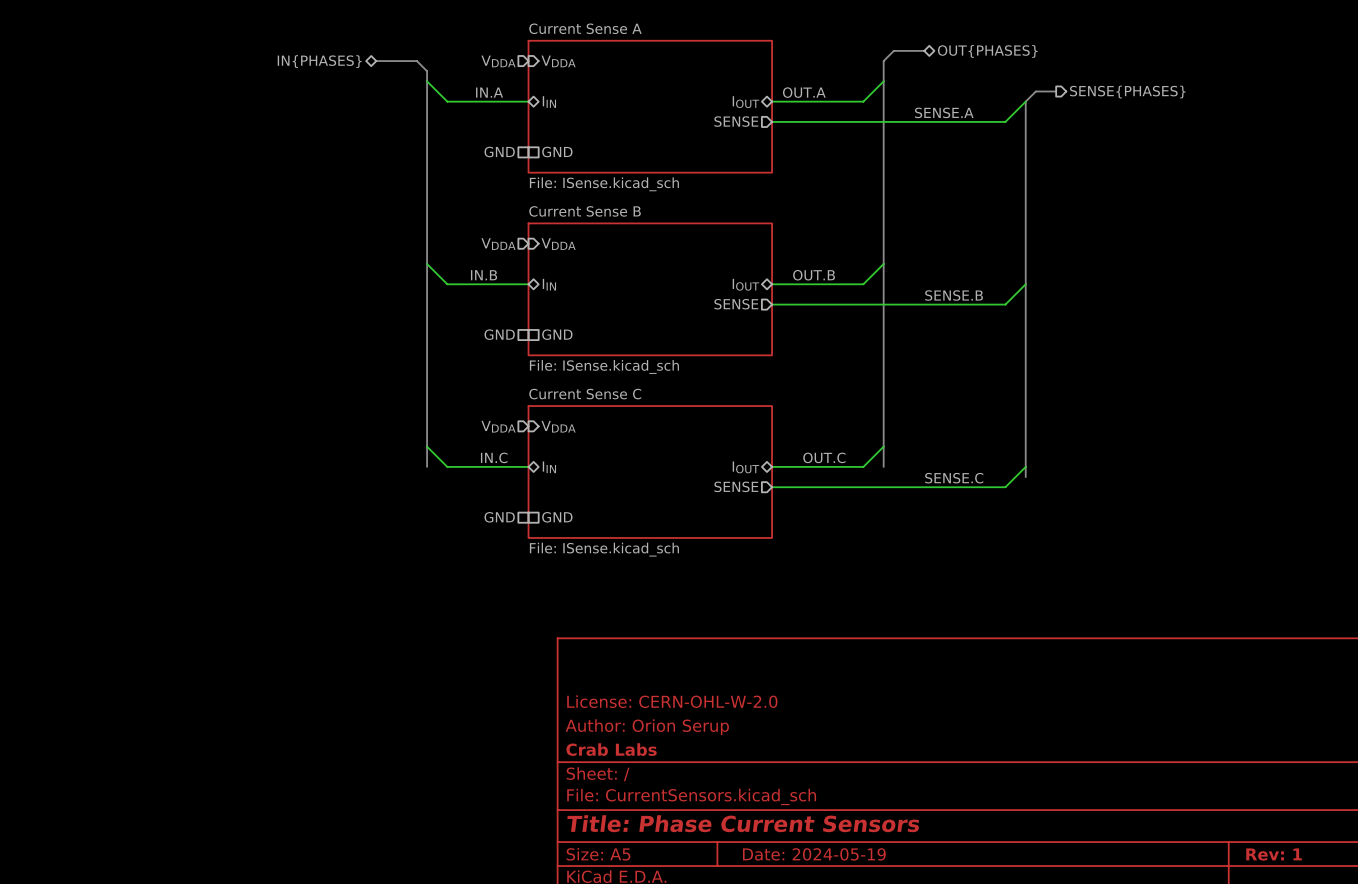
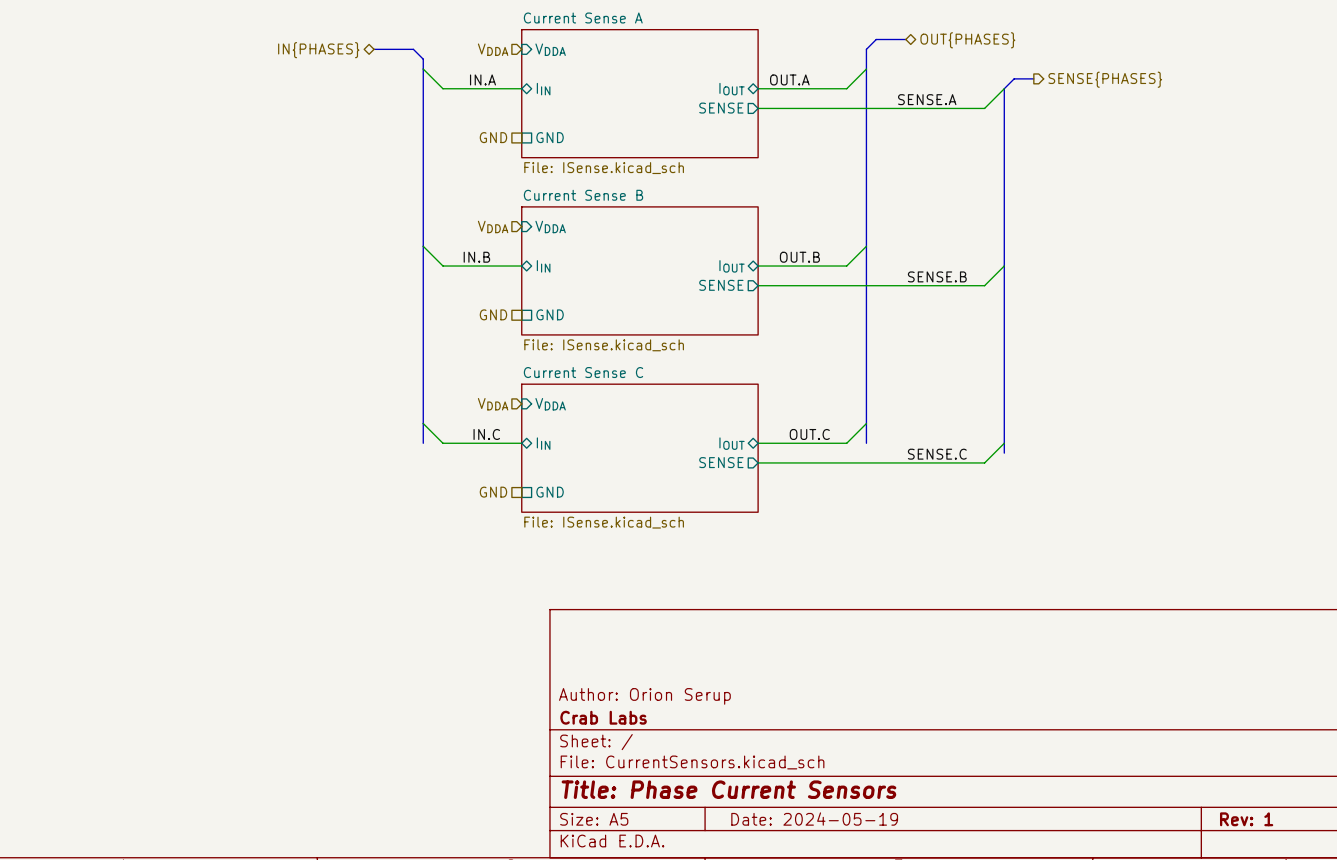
title block: License: CERN-OHL-W-2.0 (672, 701) -> none

